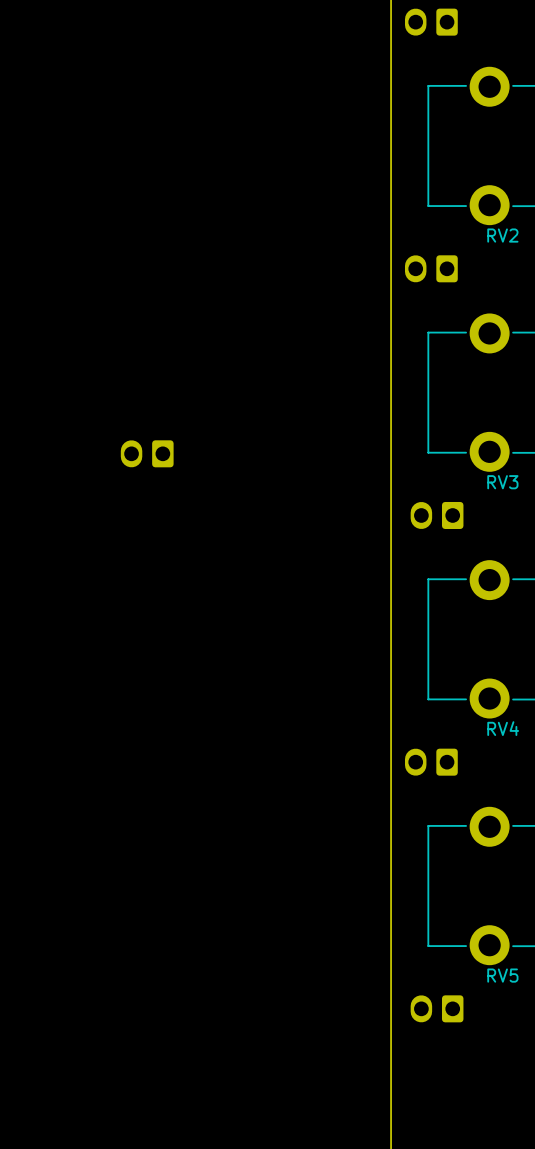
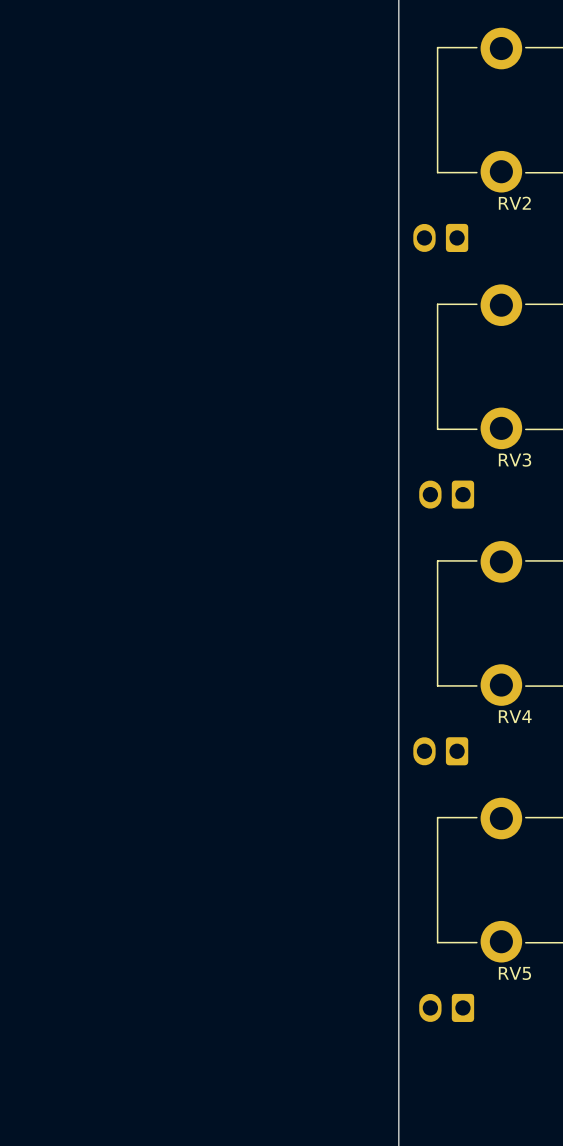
part: (147, 453) -> none

